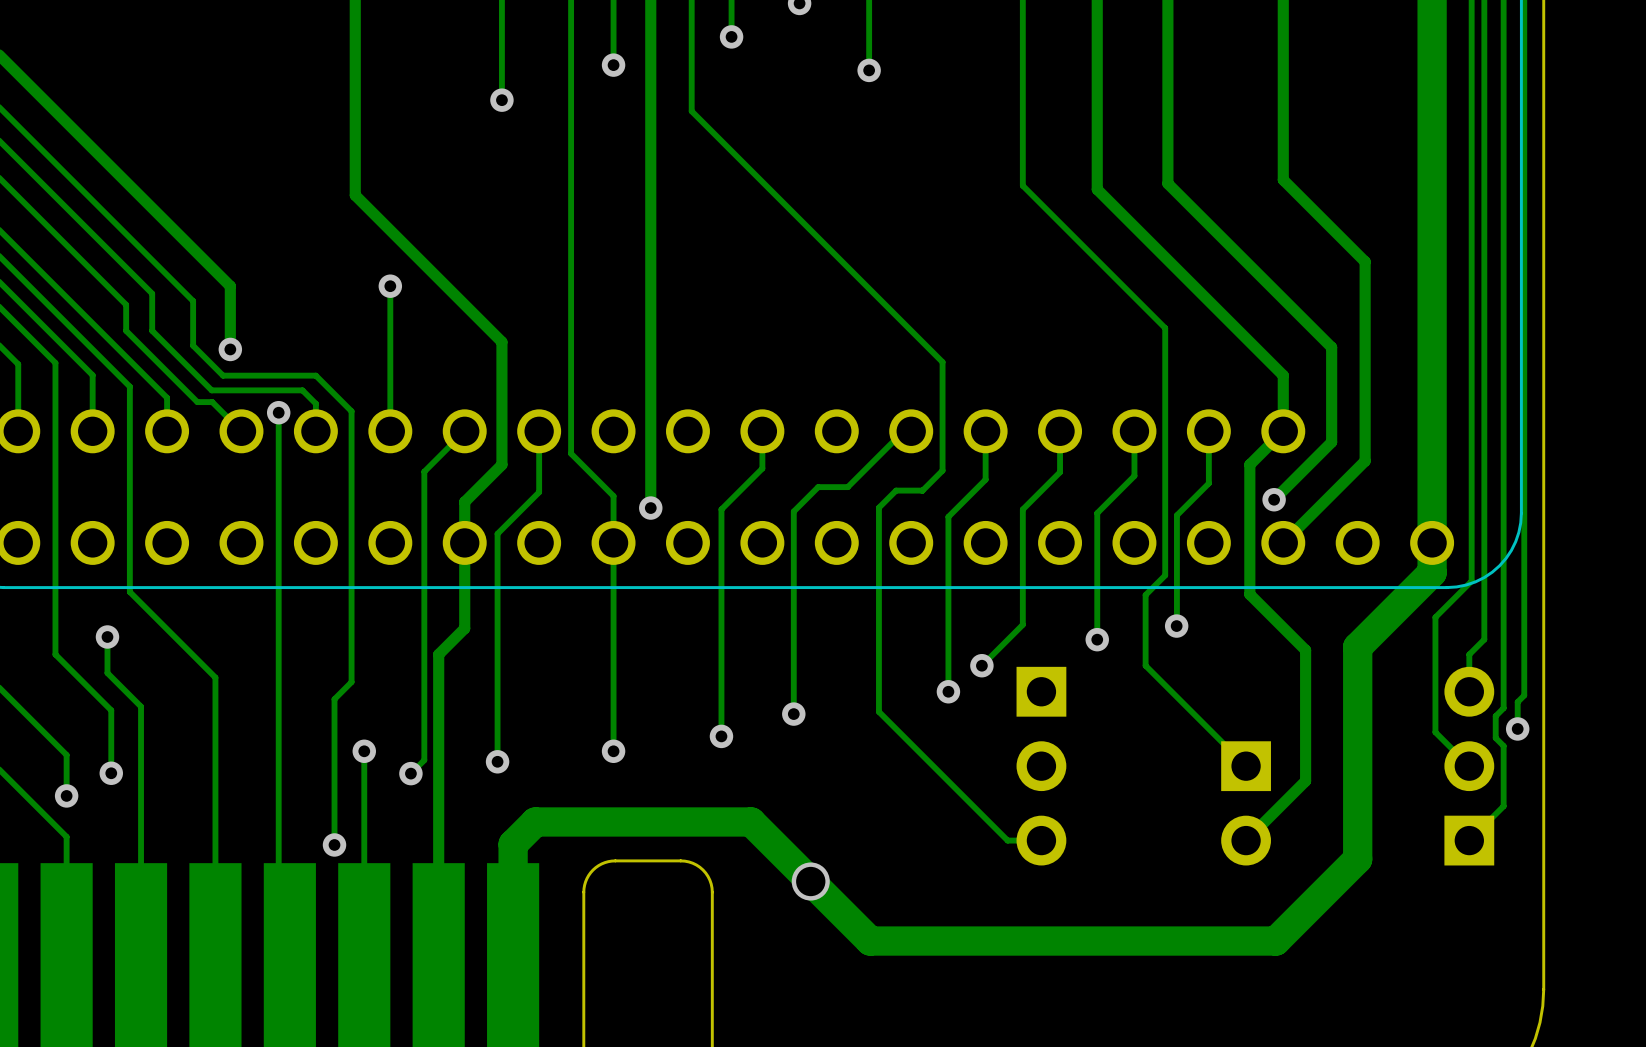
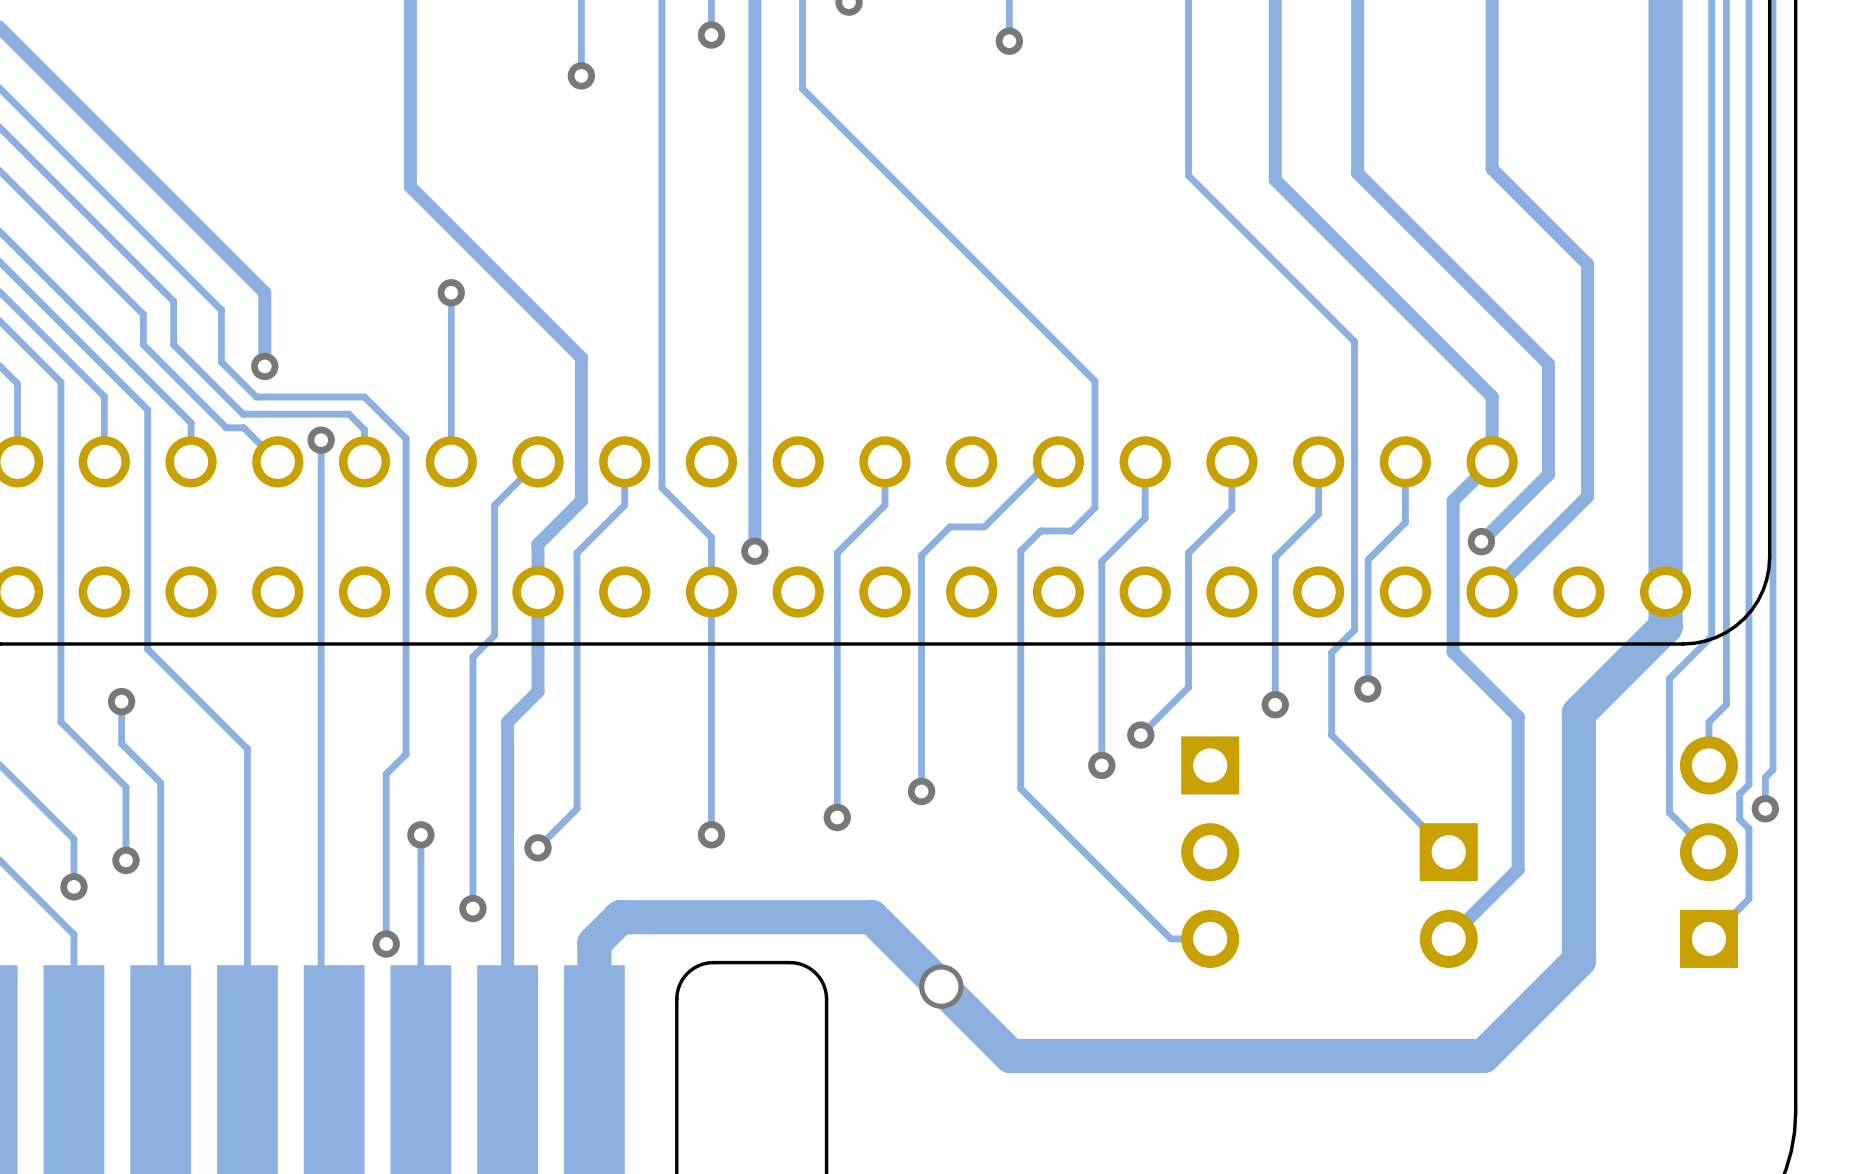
track: (427, 468) (424, 471) (424, 760) (410, 773) -> (494, 505) (494, 635) (472, 657) (472, 908)
track: (539, 468) (539, 492) (497, 533) (497, 761) -> (624, 505) (577, 552) (577, 808) (538, 847)
via: (497, 761) -> none
via: none -> (538, 847)
via: (410, 773) -> none
via: none -> (472, 908)

